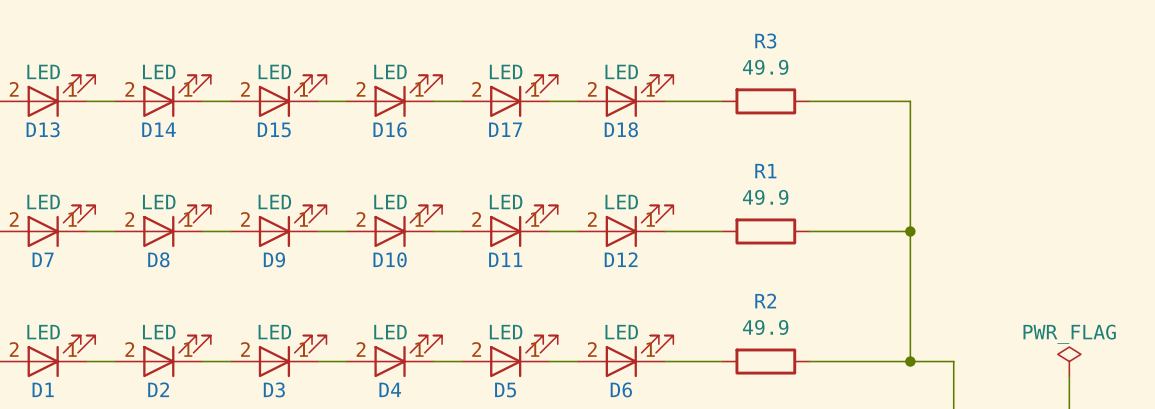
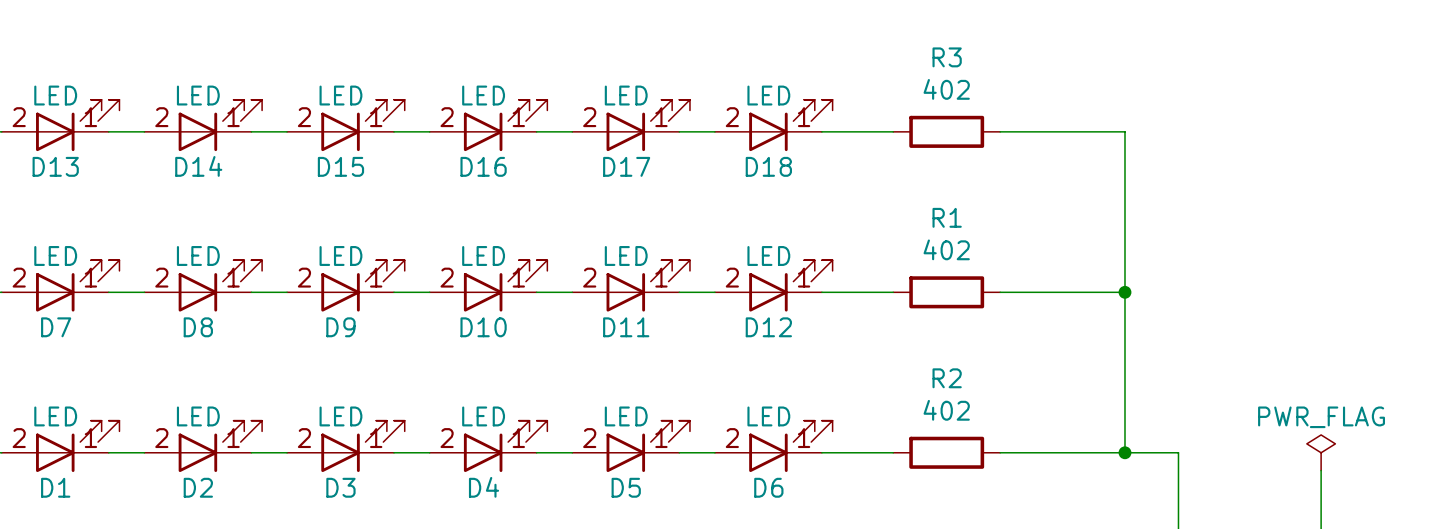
R3 value: 49.9 (765, 67) -> 402 (946, 89)
R1 value: 49.9 (765, 197) -> 402 (946, 249)
R2 value: 49.9 (765, 327) -> 402 (946, 410)

